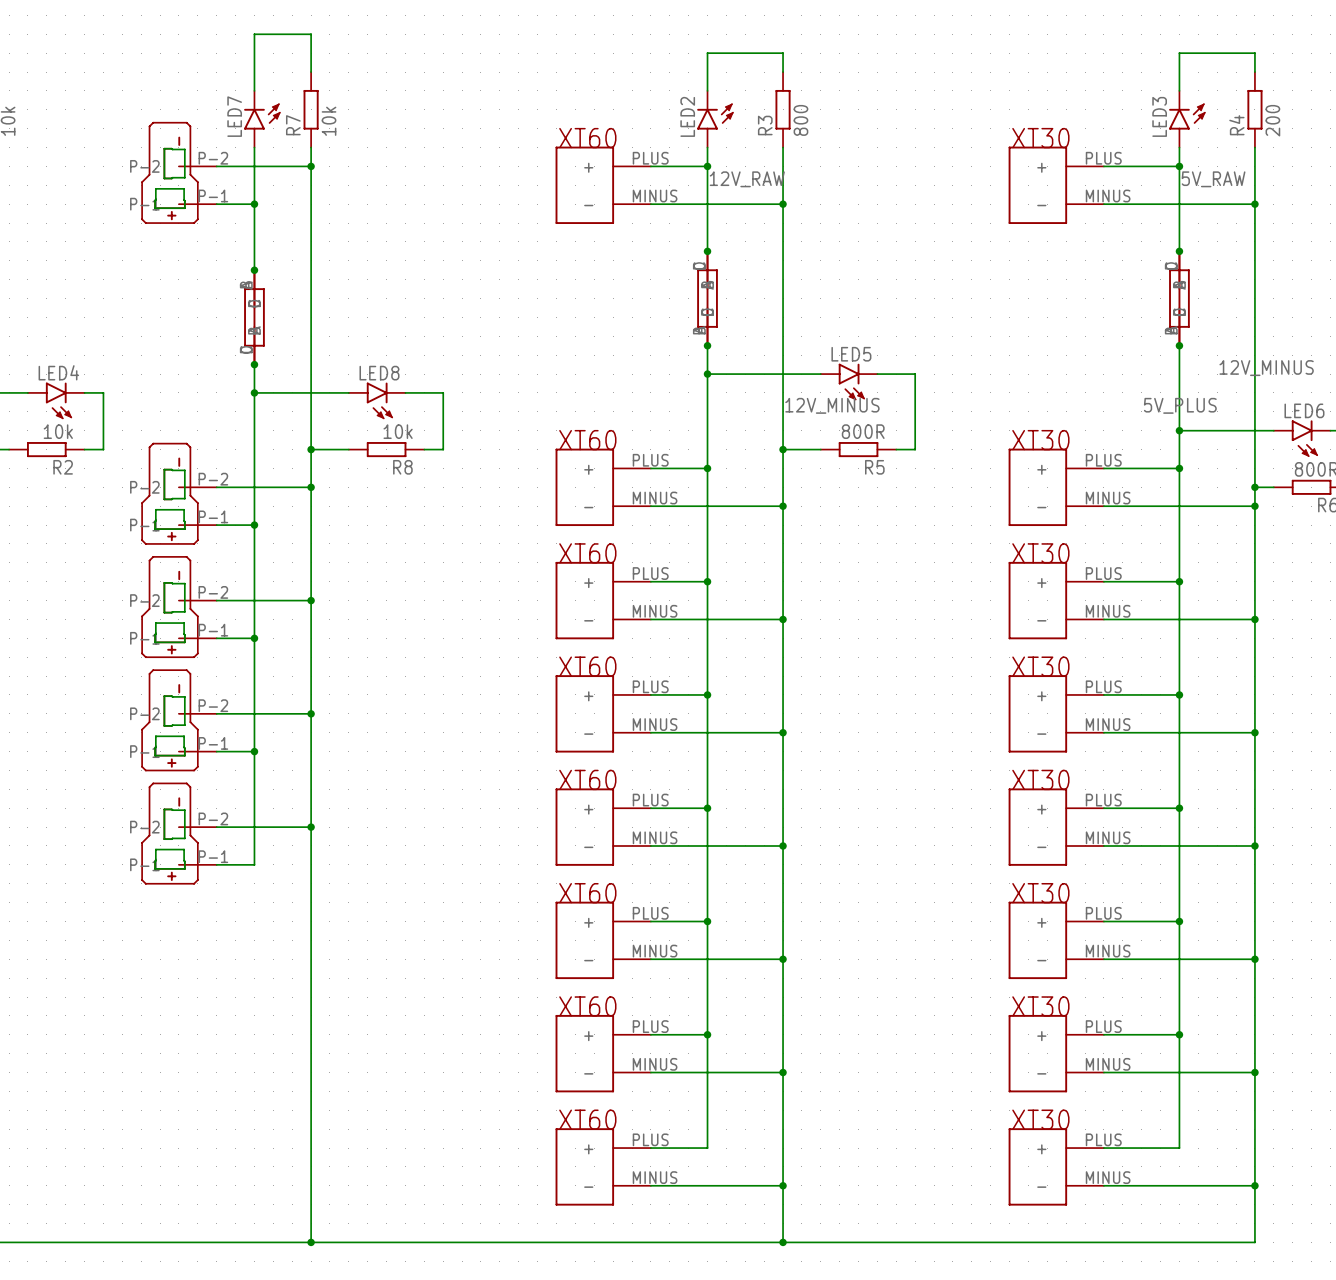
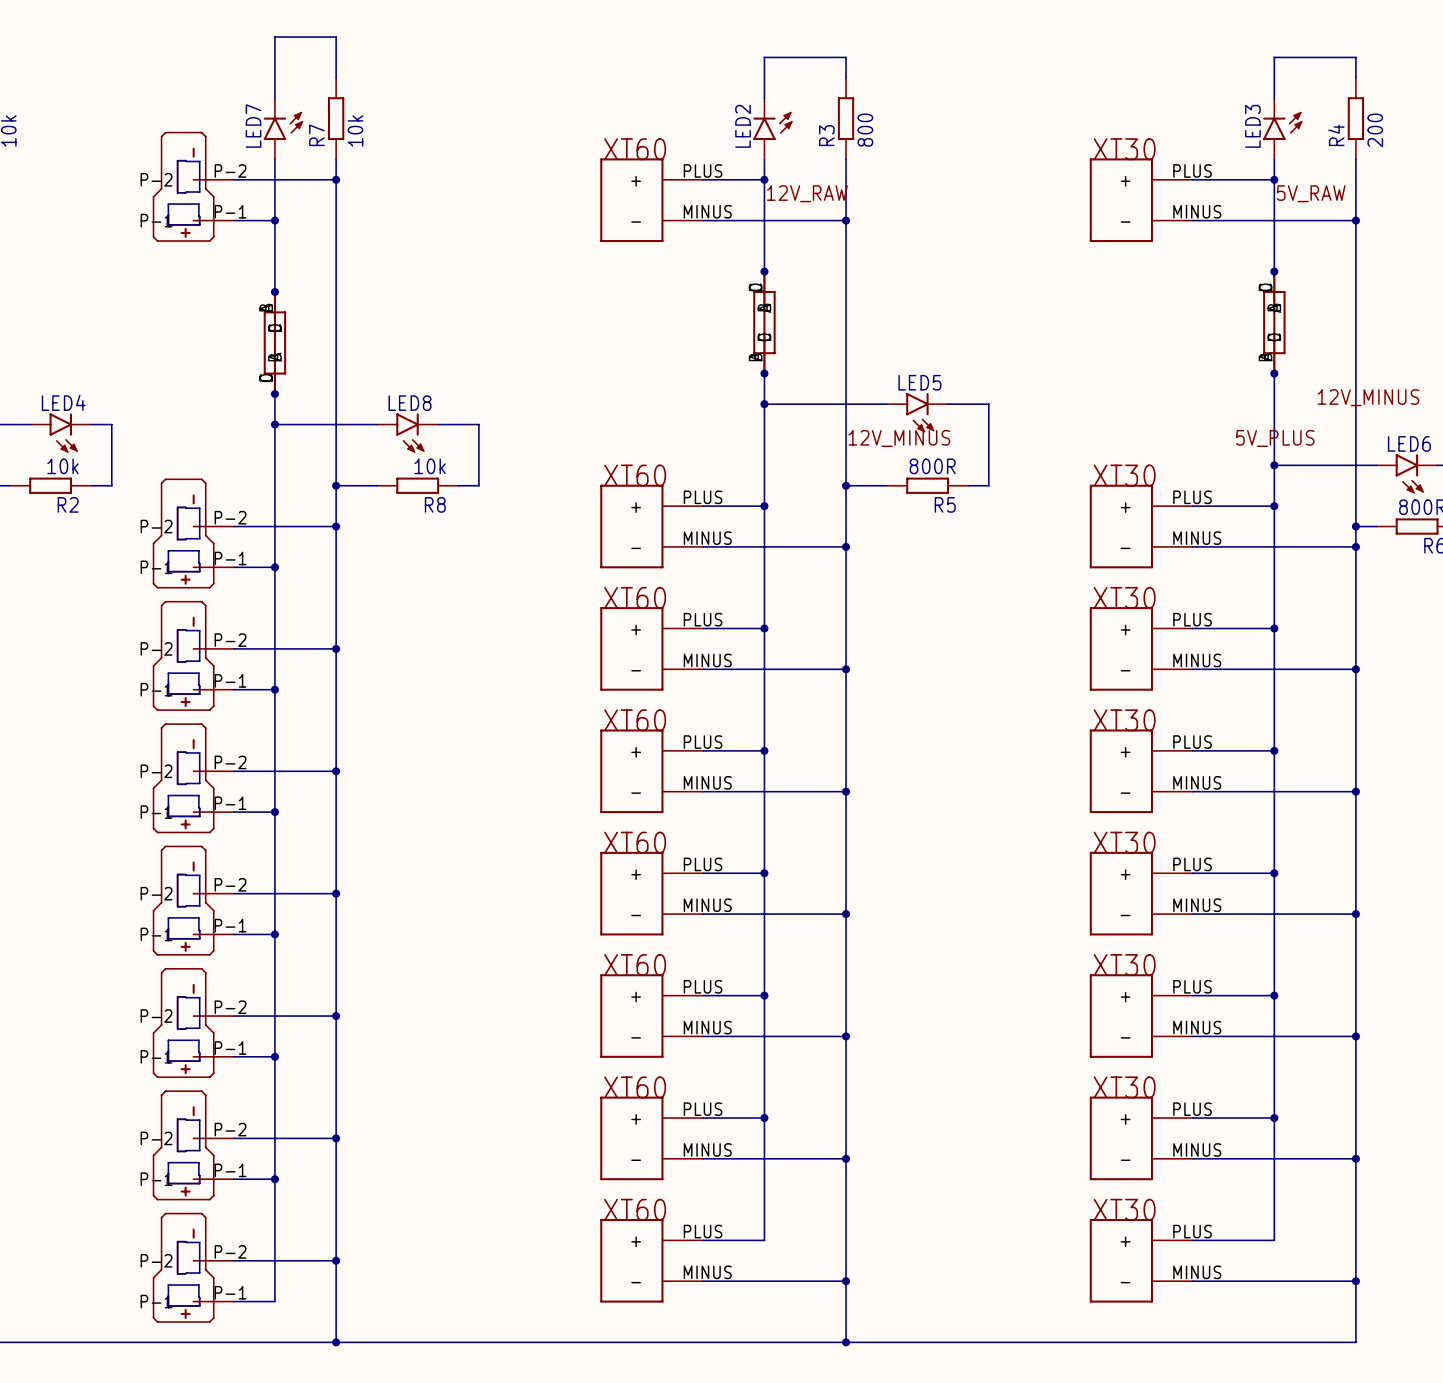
wire: none -> (274, 934) (274, 1301) (234, 1301)
junction: none -> (274, 934)
wire: none -> (234, 1016) (336, 1016)
junction: none -> (336, 1016)
part: none -> (193, 1023)
wire: none -> (234, 1056) (274, 1056)
junction: none -> (274, 1056)
wire: none -> (234, 1138) (336, 1138)
junction: none -> (336, 1138)
part: none -> (193, 1145)
wire: none -> (234, 1179) (274, 1179)
junction: none -> (274, 1179)
wire: none -> (234, 1260) (336, 1260)
junction: none -> (336, 1260)
part: none -> (193, 1267)

